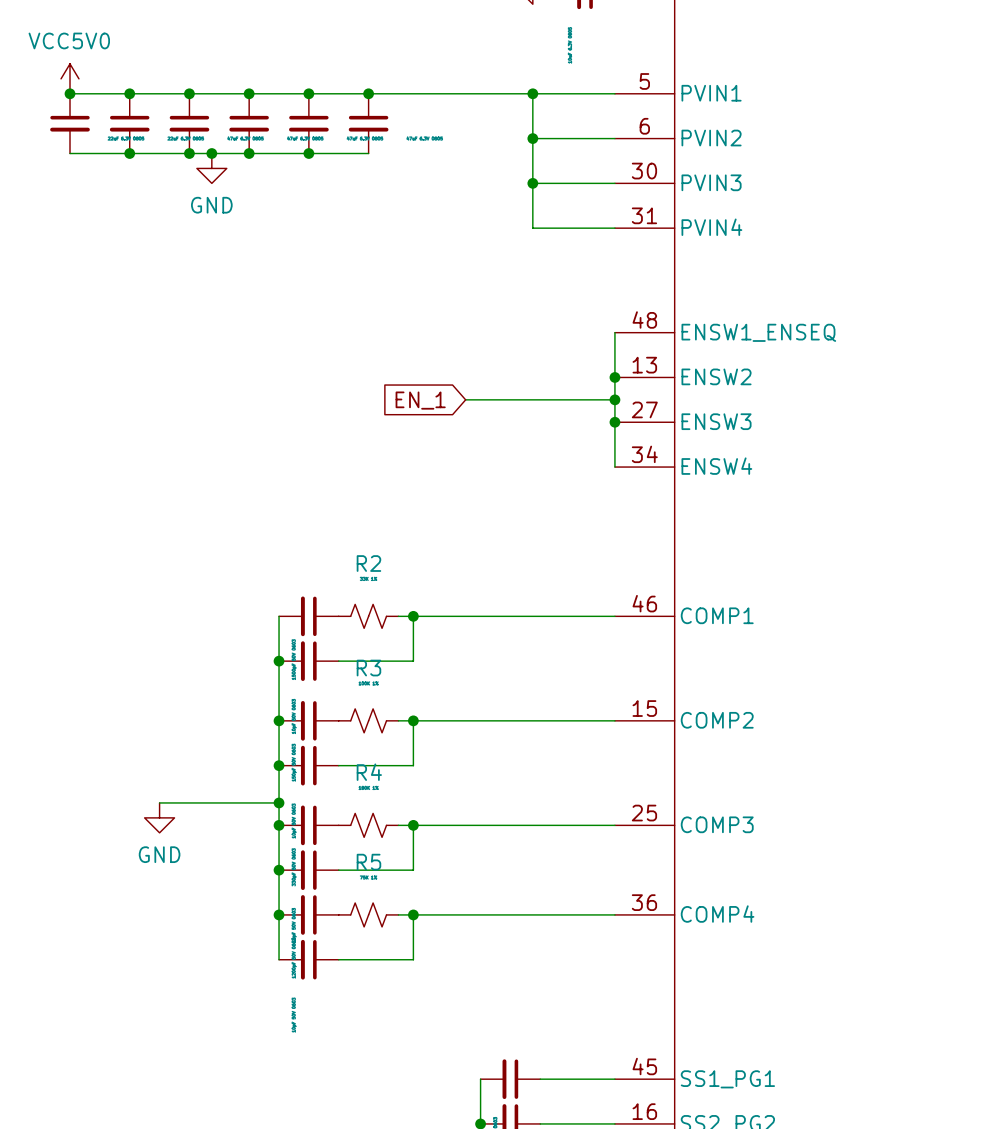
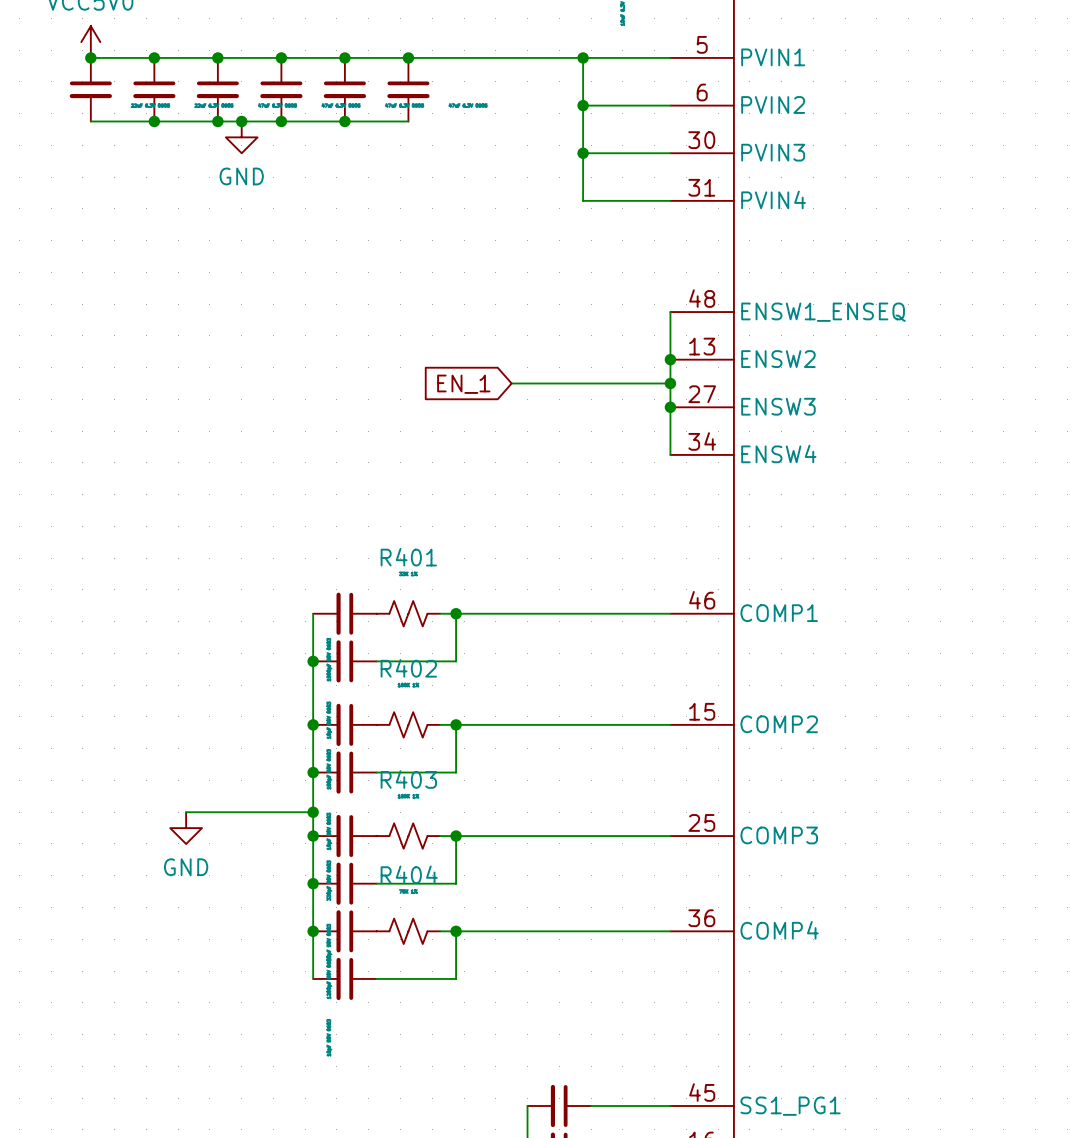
R2 name: R2 (368, 563) -> R401 (408, 557)
R3 name: R3 (368, 668) -> R402 (408, 668)
R4 name: R4 (369, 772) -> R403 (408, 779)
R5 name: R5 (368, 862) -> R404 (409, 874)

